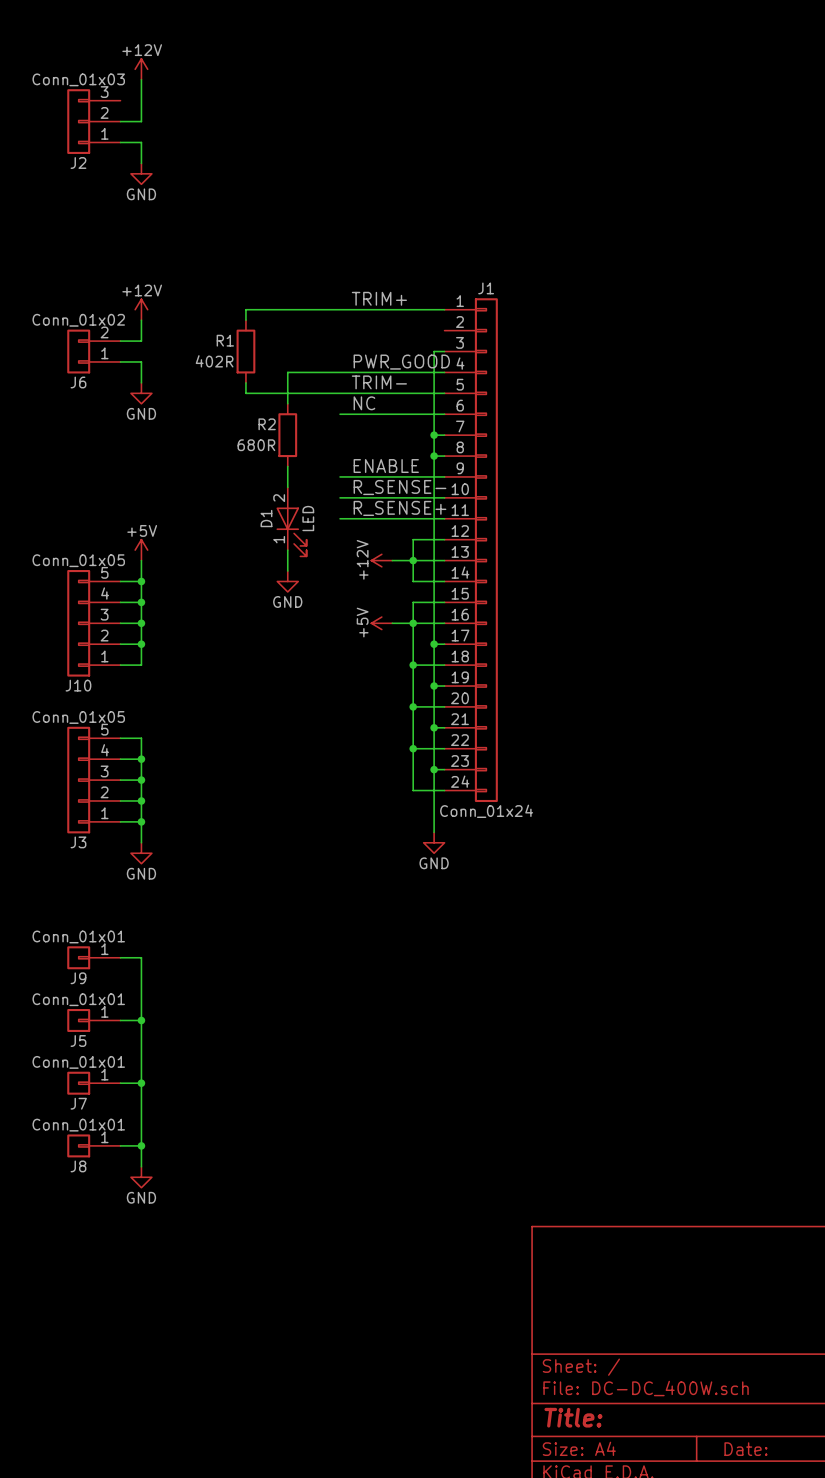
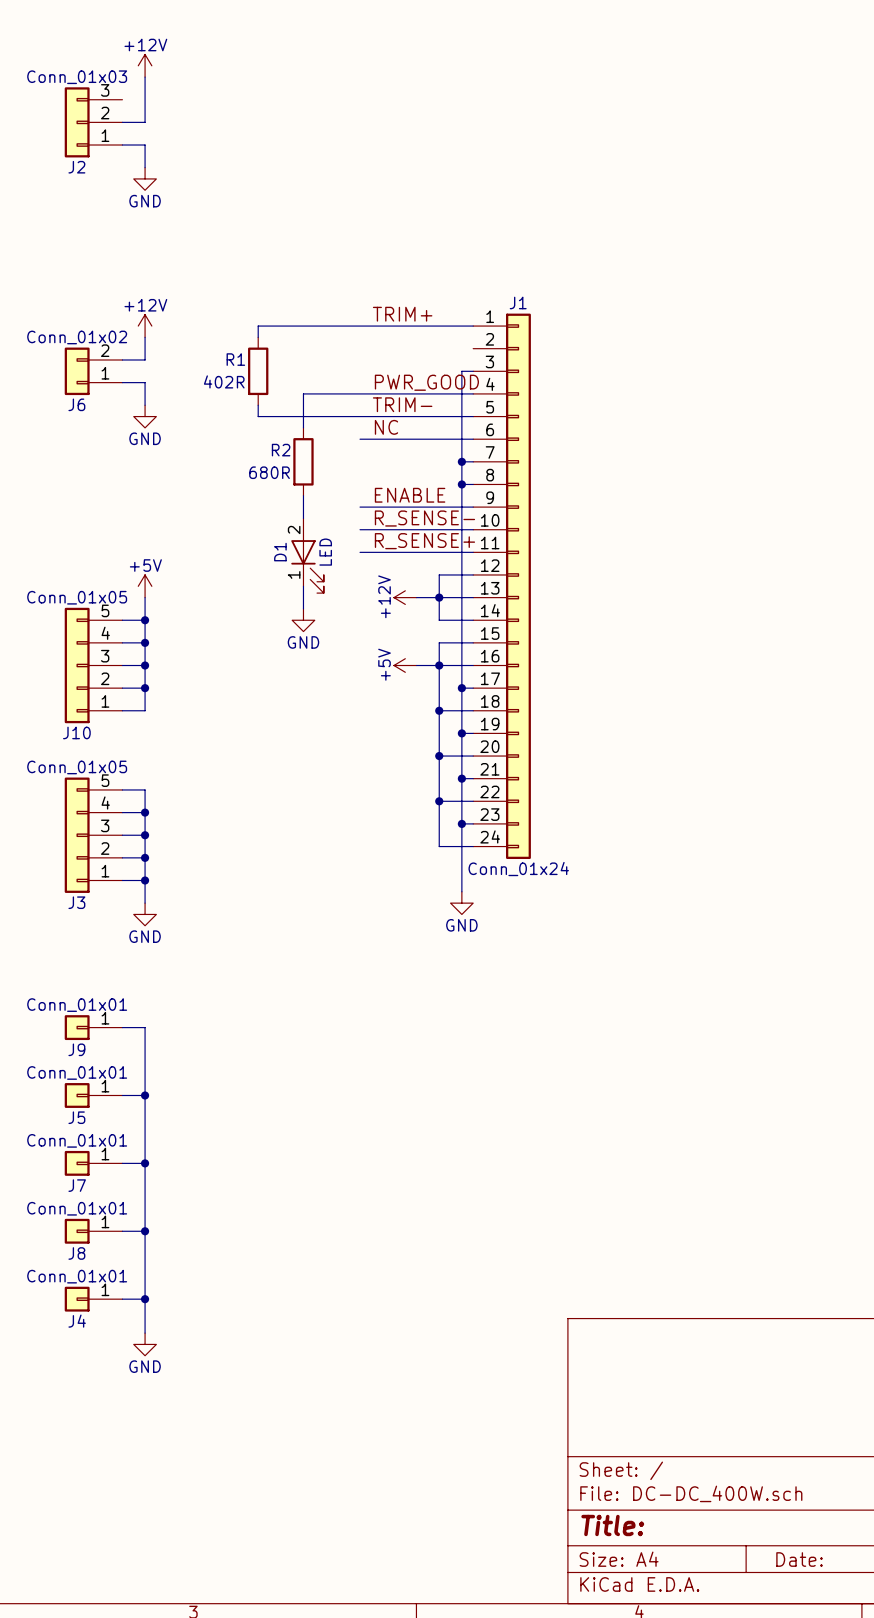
wire: none -> (145, 1253) (145, 1333)
power symbol position: GND (141, 1177) -> GND (145, 1344)
J4: none -> Conn_01x01 (93, 1299)
wire: none -> (122, 1299) (145, 1299)
junction: none -> (145, 1299)

